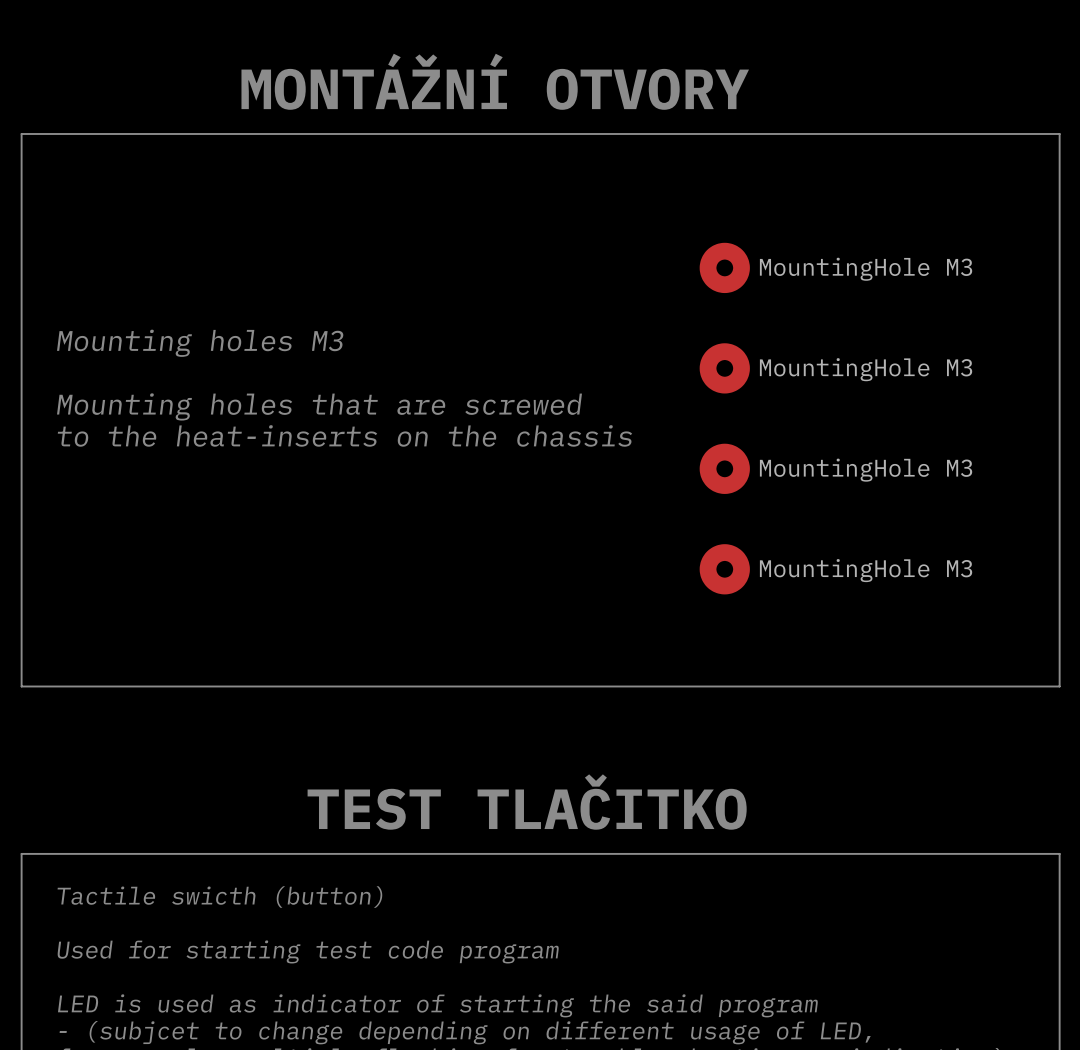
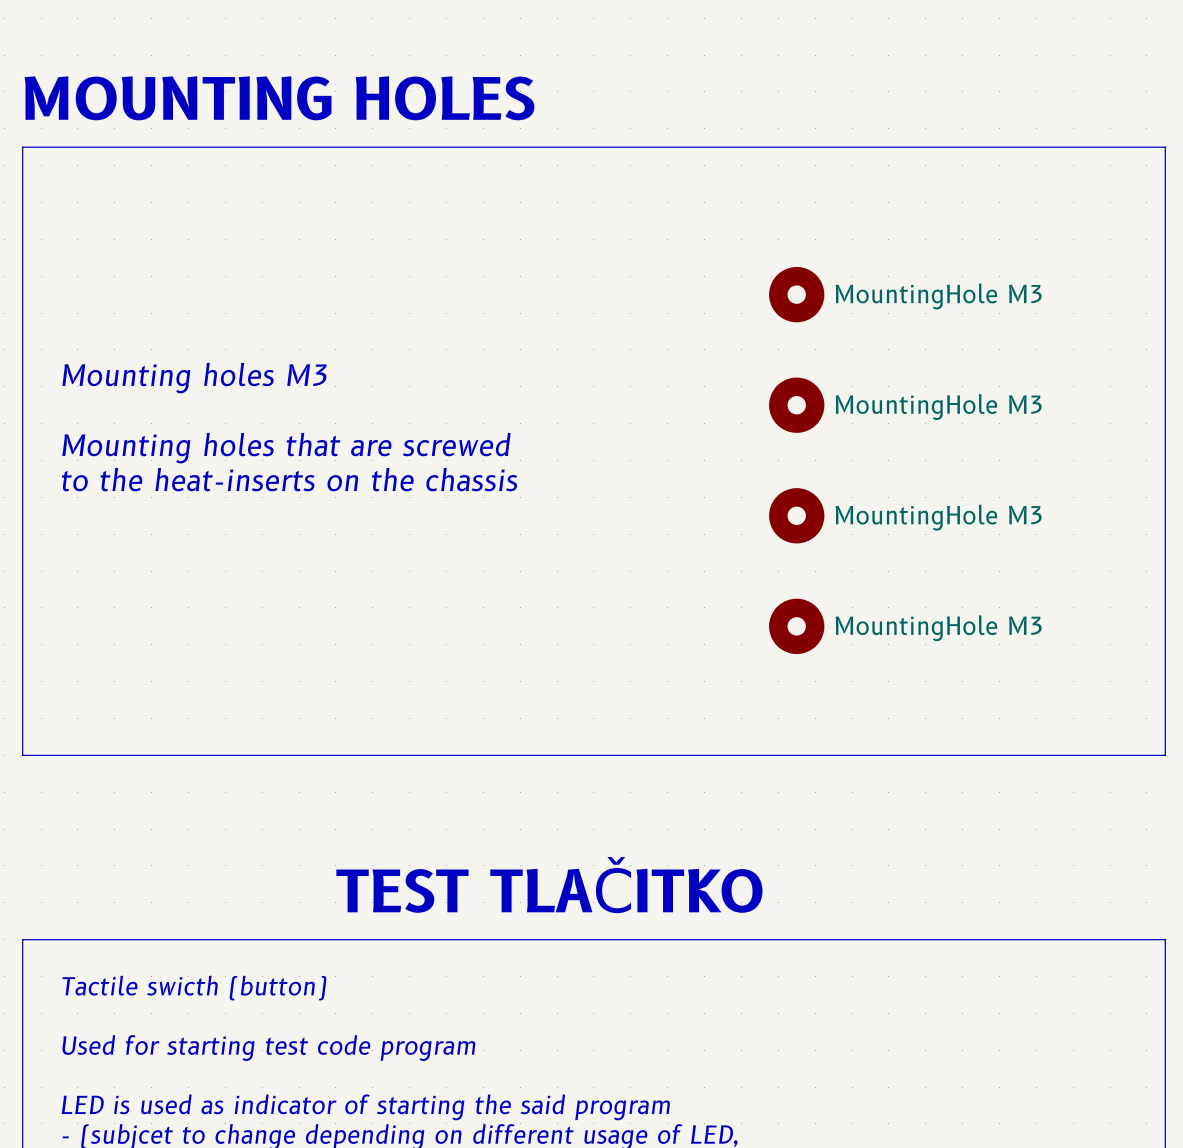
text: MONTÁŽNÍ OTVORY (495, 81) -> none
text: none -> MOUNTING HOLES (279, 98)

